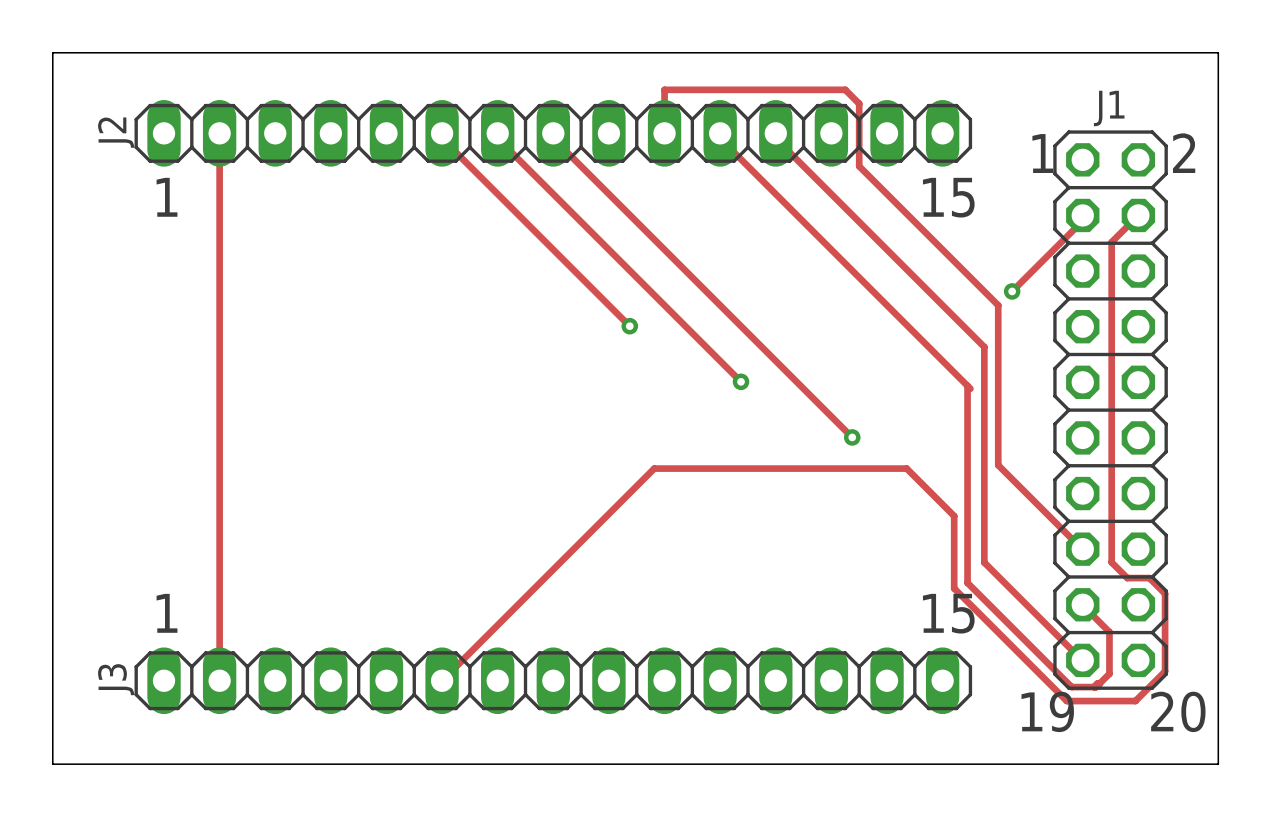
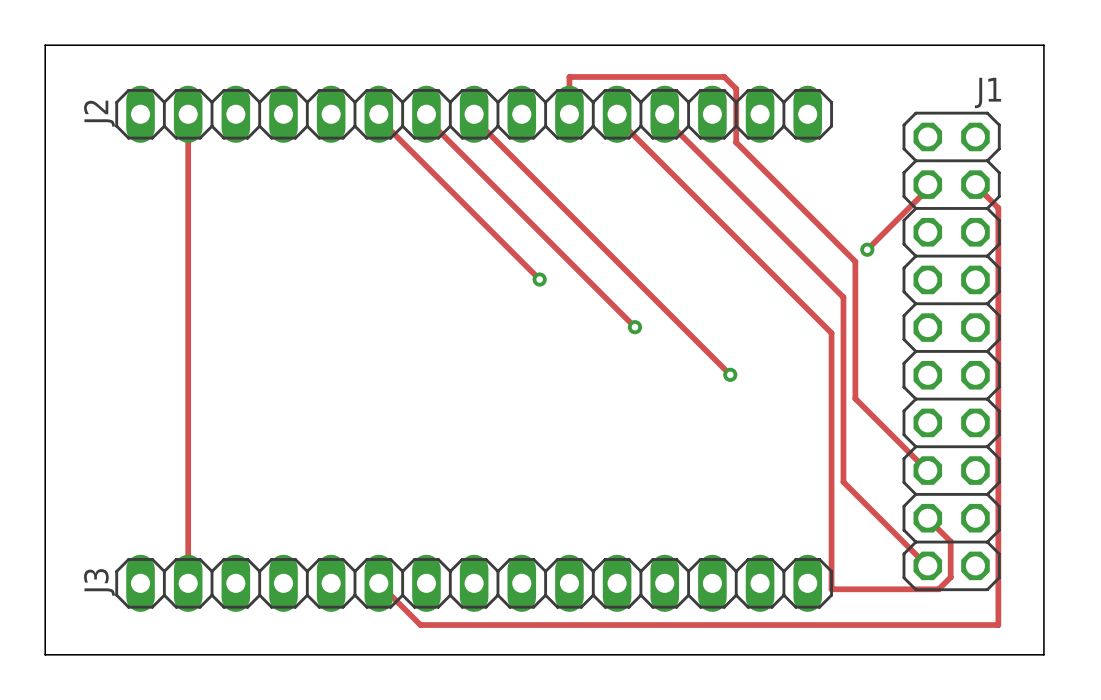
J1 name position: J1 (1109, 108) -> J1 (987, 92)
text: 1 (1042, 153) -> none
text: 2 (1184, 153) -> none
text: 1 (167, 197) -> none
text: 15 (948, 197) -> none
track: (1138, 215) (1111, 242) (1111, 562) (1127, 578) (1149, 578) (1165, 593) -> (975, 184) (998, 208) (998, 508)
track: (967, 385) (967, 582) (1071, 687) (1093, 687) (1099, 683) -> none
track: none -> (831, 333) (831, 589) (938, 589)
text: 1 (167, 613) -> none
text: 15 (948, 613) -> none
track: (1165, 671) (1135, 701) (1066, 701) (954, 588) (954, 516) (906, 468) (654, 468) (442, 680) -> (998, 575) (998, 625) (420, 625) (378, 583)
text: 19 (1047, 711) -> none
text: 20 (1178, 711) -> none

